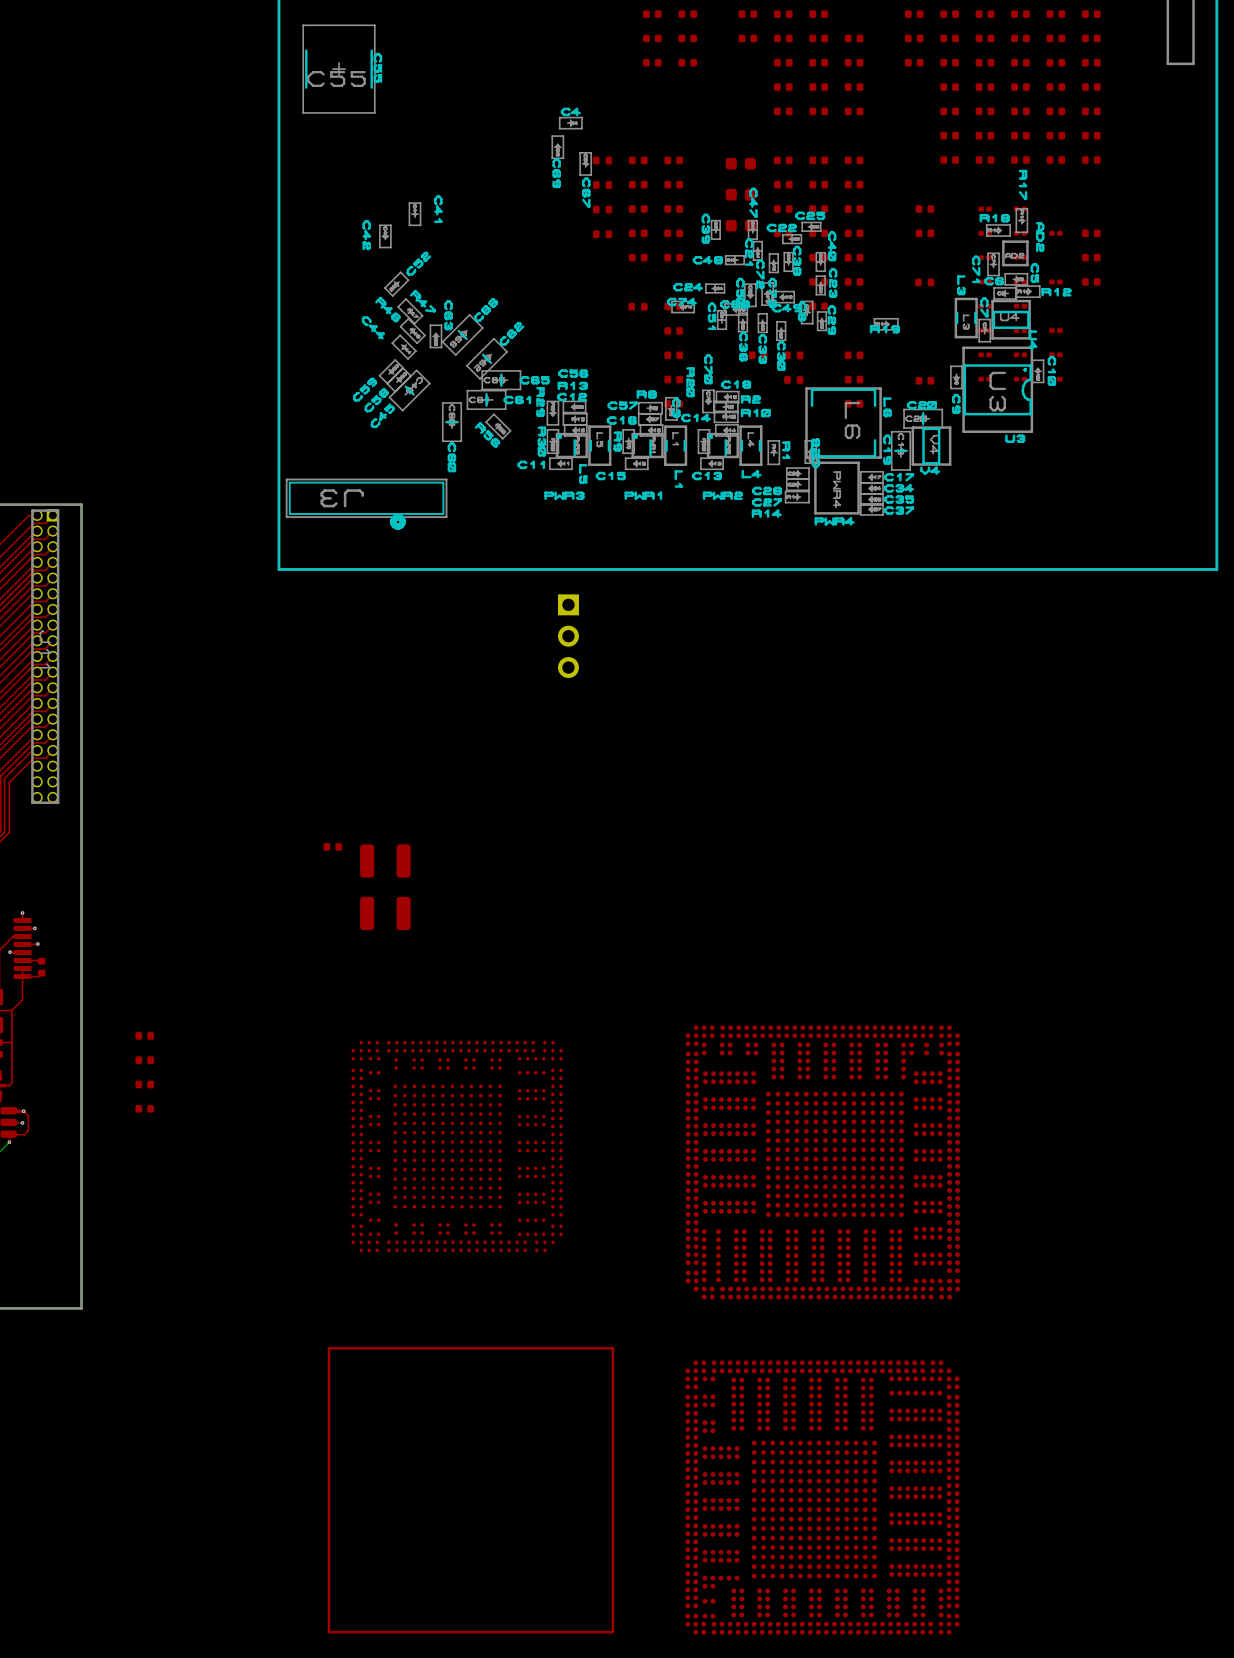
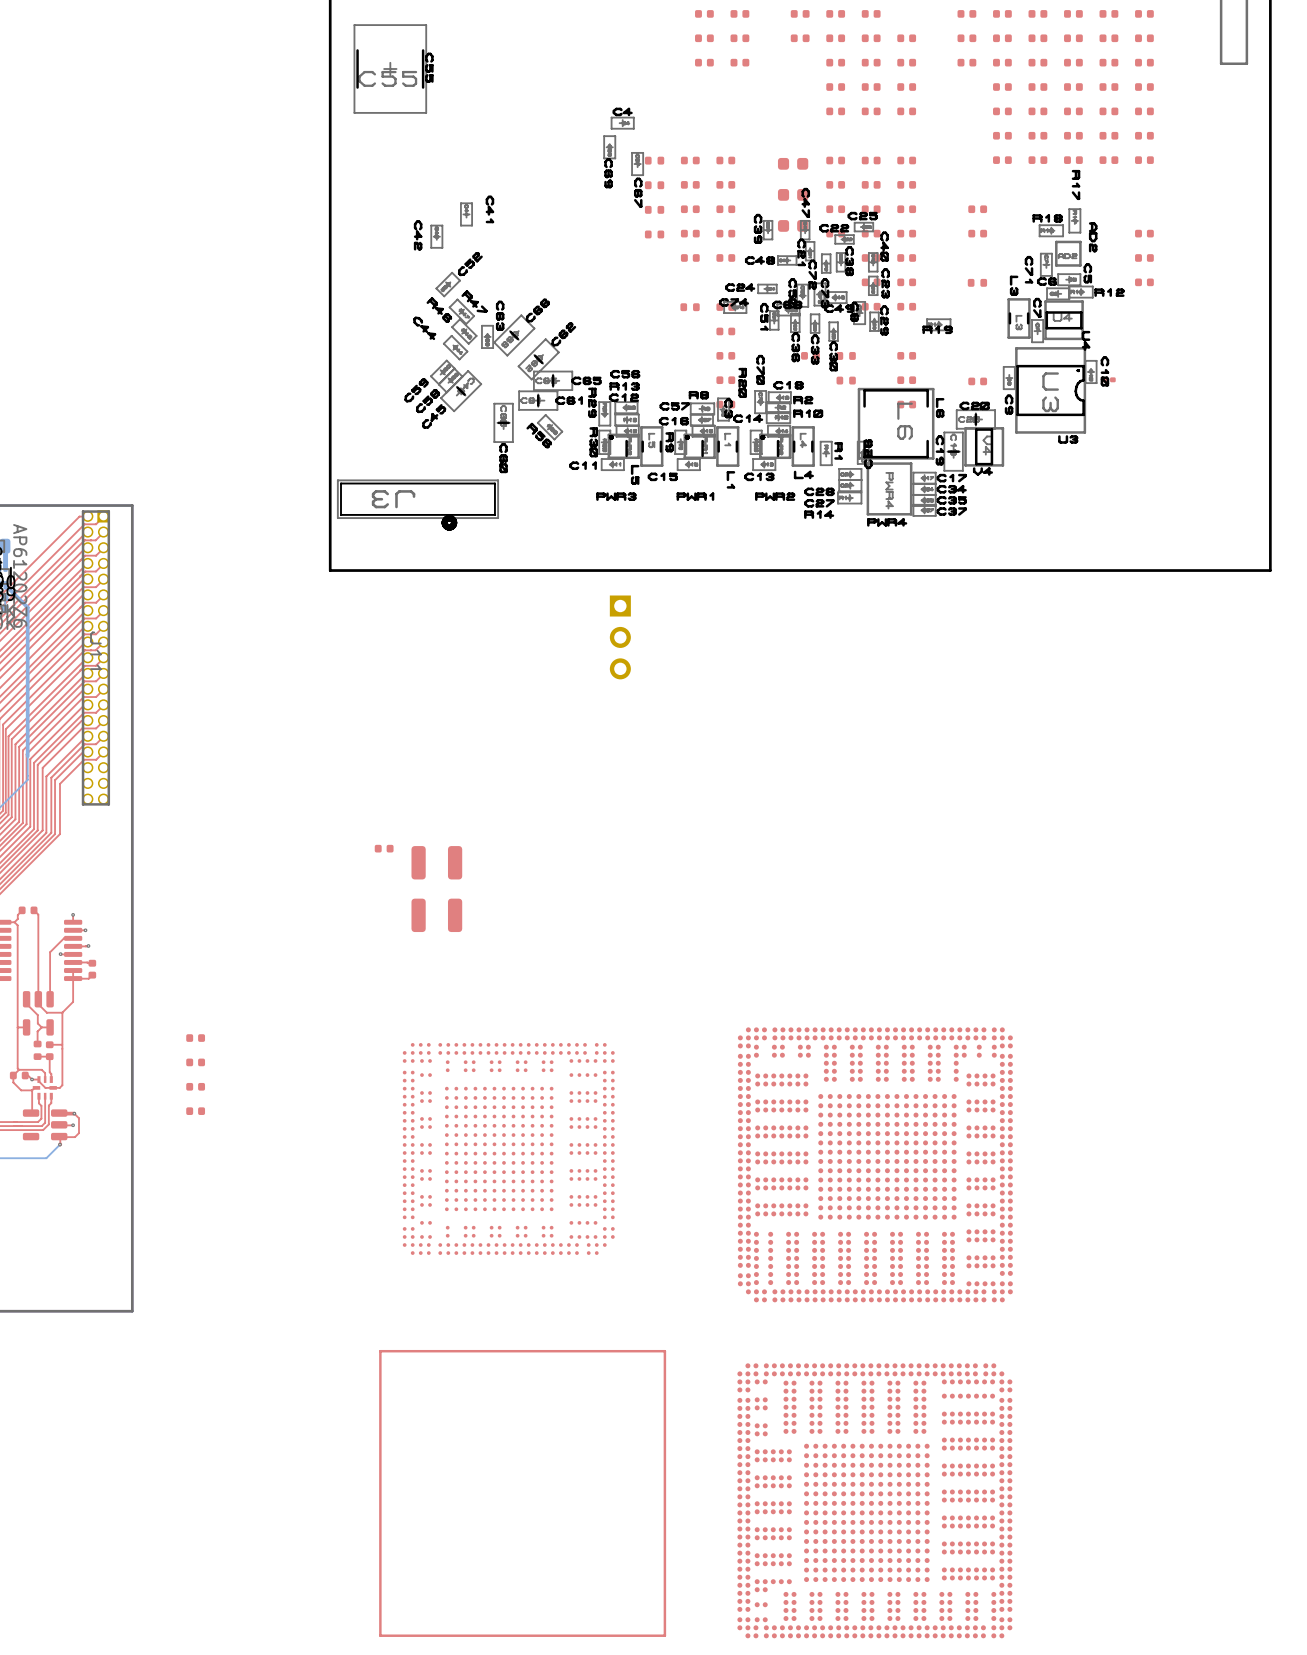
part: (985, 209) -> none
part: (1020, 209) -> none
part: (985, 233) -> none
part: (1020, 233) -> none
part: (1055, 233) -> none
part: (985, 257) -> none
part: (1020, 257) -> none
part: (985, 281) -> none
part: (1020, 281) -> none
part: (1055, 281) -> none
part: (985, 306) -> none
part: (1020, 306) -> none
part: (985, 330) -> none
part: (1020, 330) -> none
part: (1055, 330) -> none
part: (985, 354) -> none
part: (1020, 354) -> none
part: (1055, 354) -> none
part: (985, 379) -> none
part: (1020, 379) -> none

